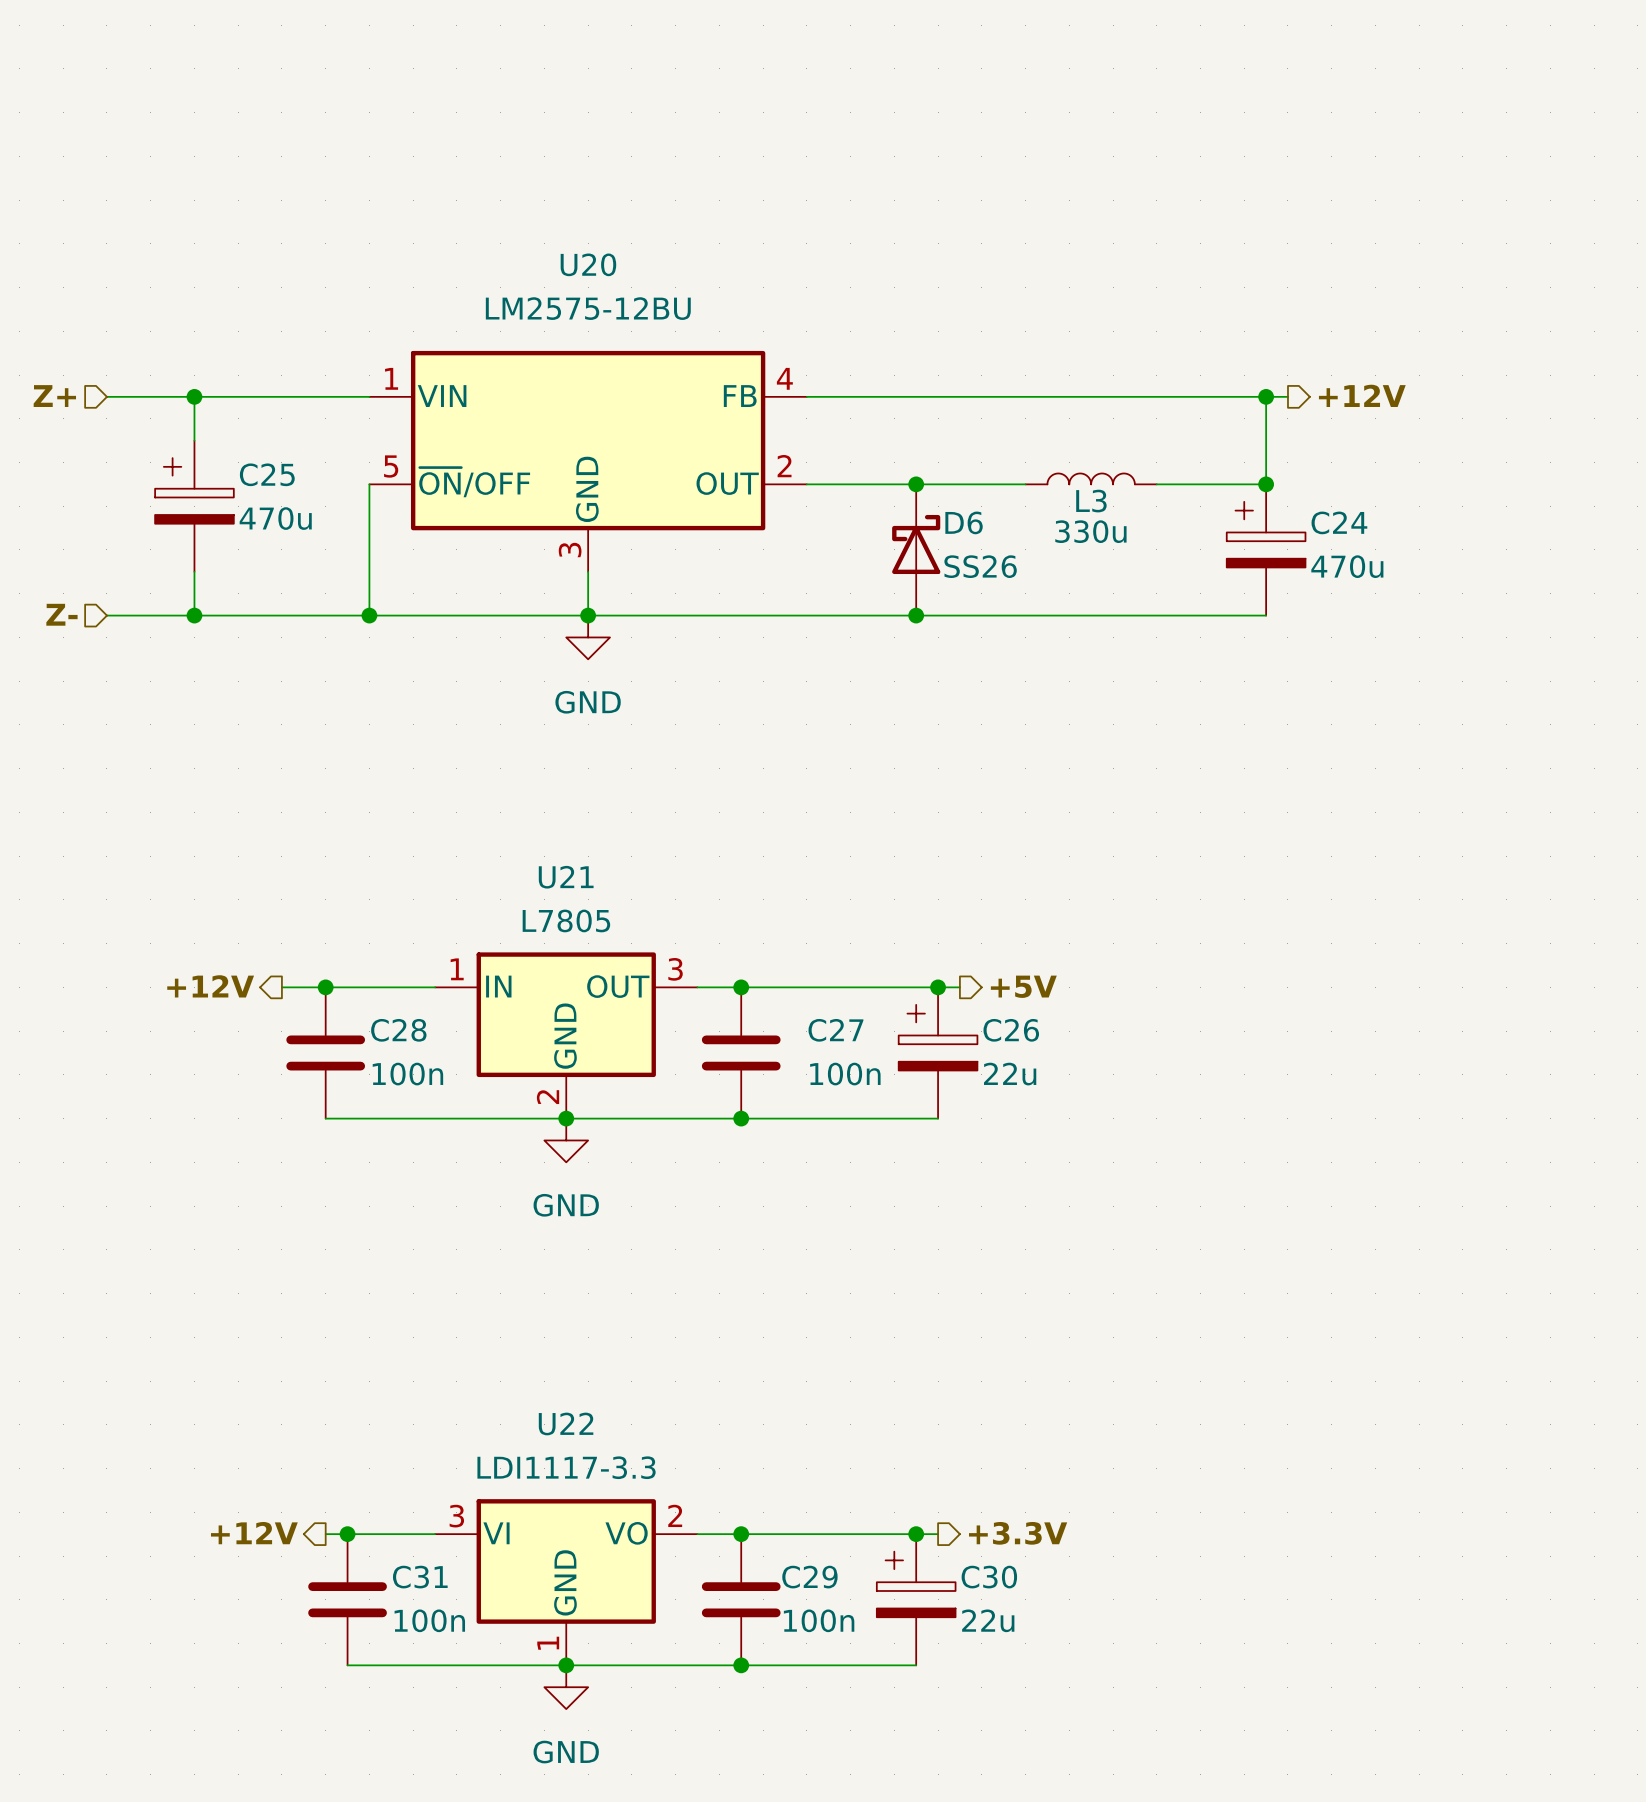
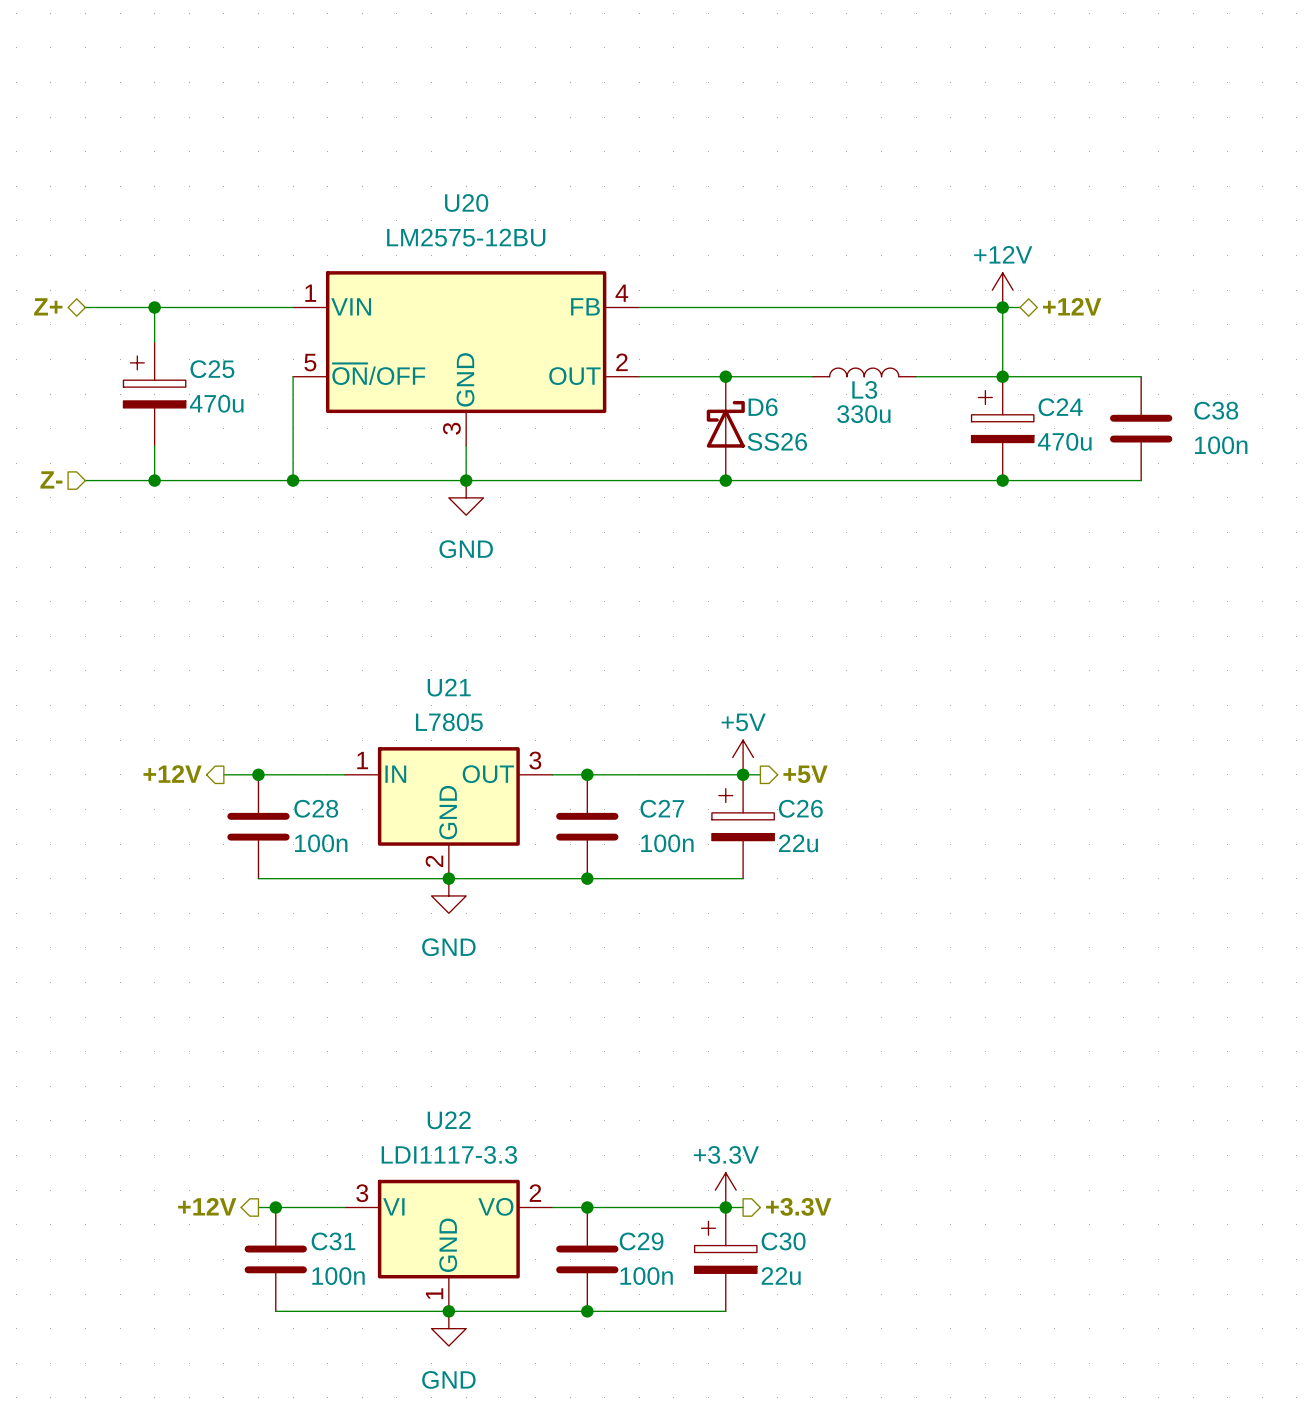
power symbol: none -> +12V (1002, 290)
hierarchical label shape: output (1362, 395) -> bidirectional (1072, 306)
hierarchical label shape: input (54, 396) -> bidirectional (48, 306)
wire: none -> (1002, 376) (1141, 376)
C38: none -> 100n (1141, 428)
wire: none -> (1002, 480) (1141, 480)
junction: none -> (1002, 480)
power symbol: none -> +5V (743, 757)
power symbol: none -> +3.3V (725, 1190)

